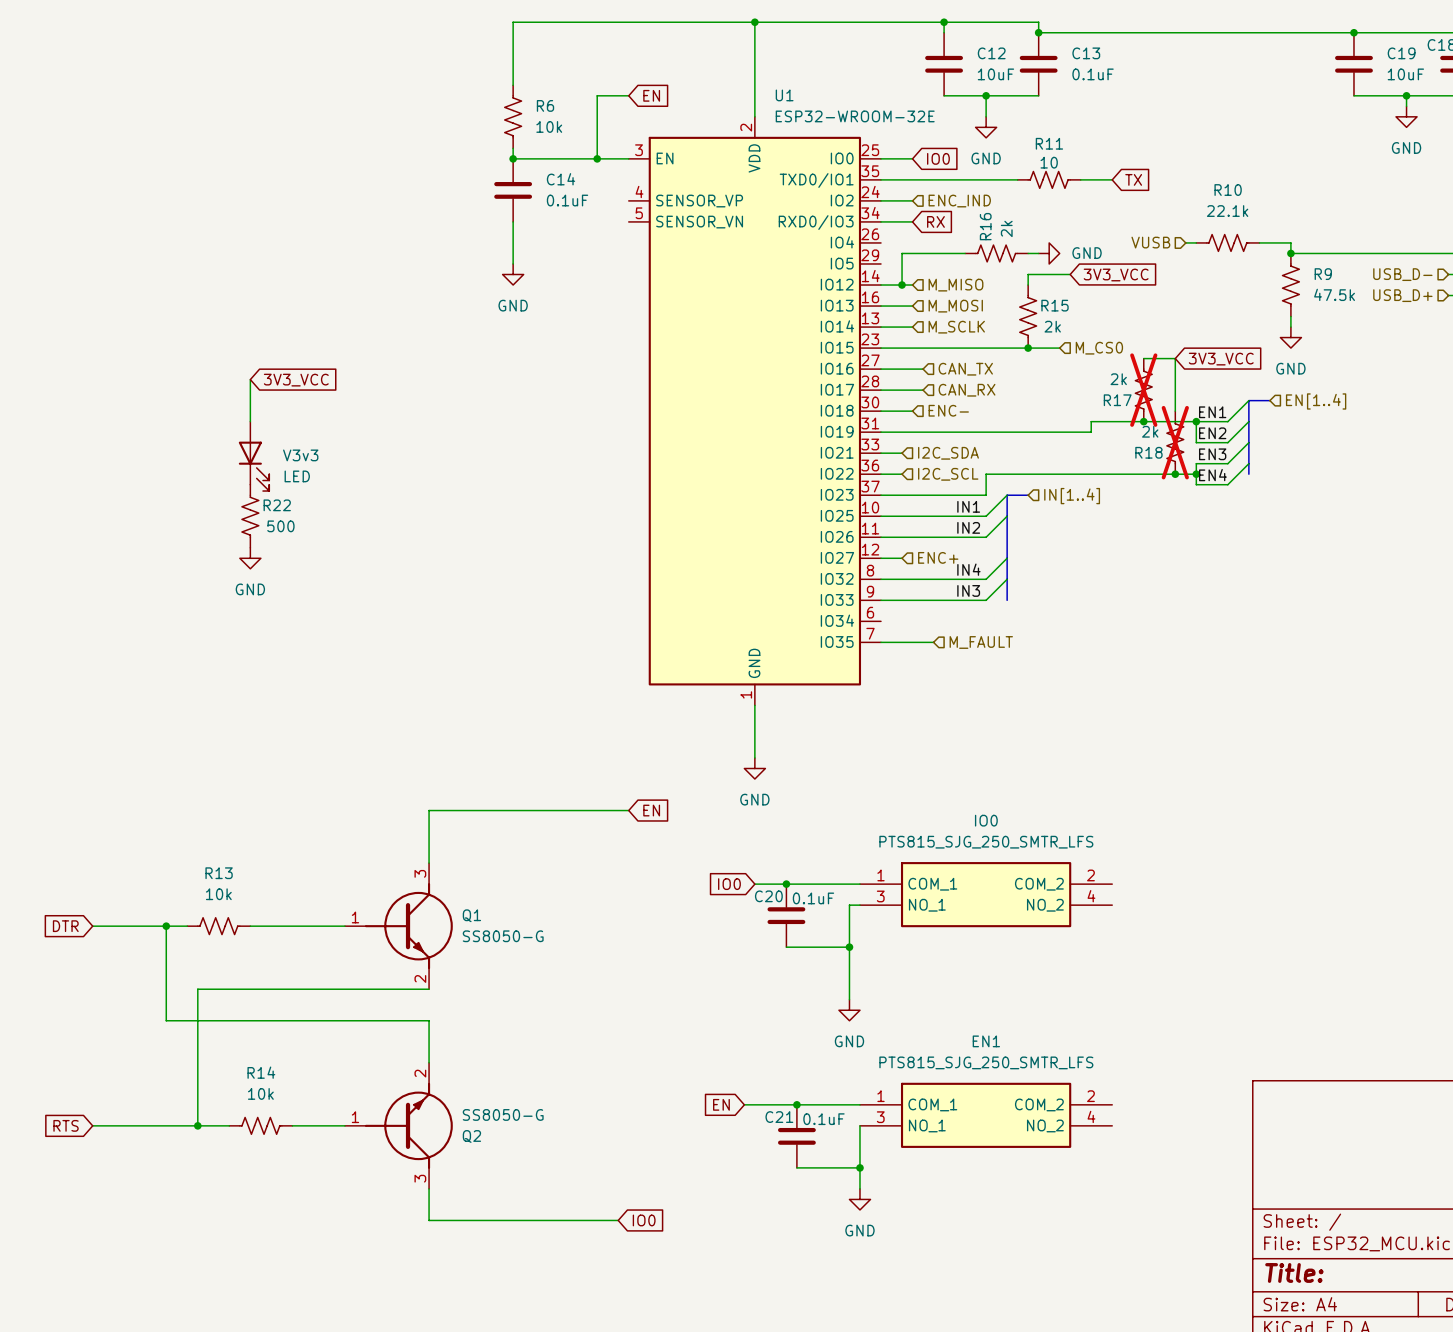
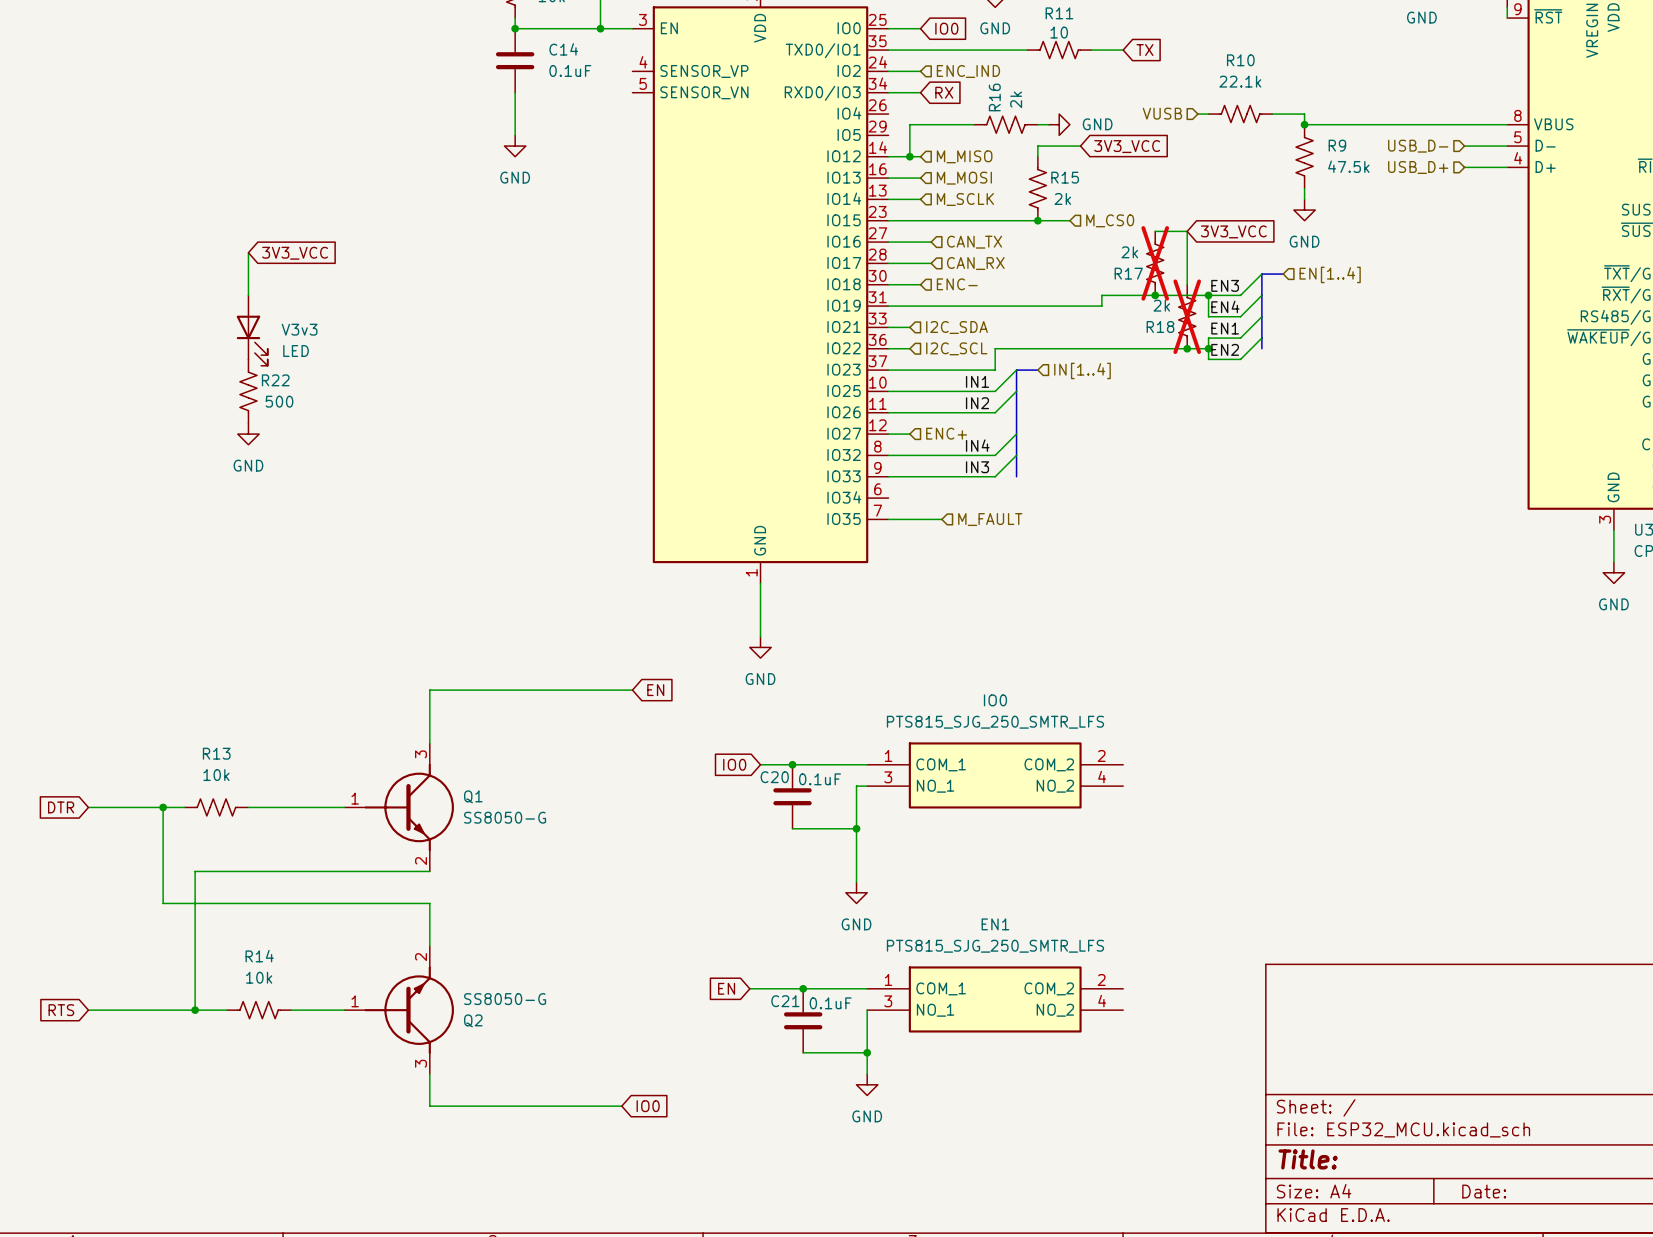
label: EN1 (1212, 412) -> EN3 (1225, 285)
label: EN2 (1212, 433) -> EN4 (1225, 306)
label: EN3 (1212, 454) -> EN1 (1225, 328)
label: EN4 (1212, 475) -> EN2 (1225, 349)

